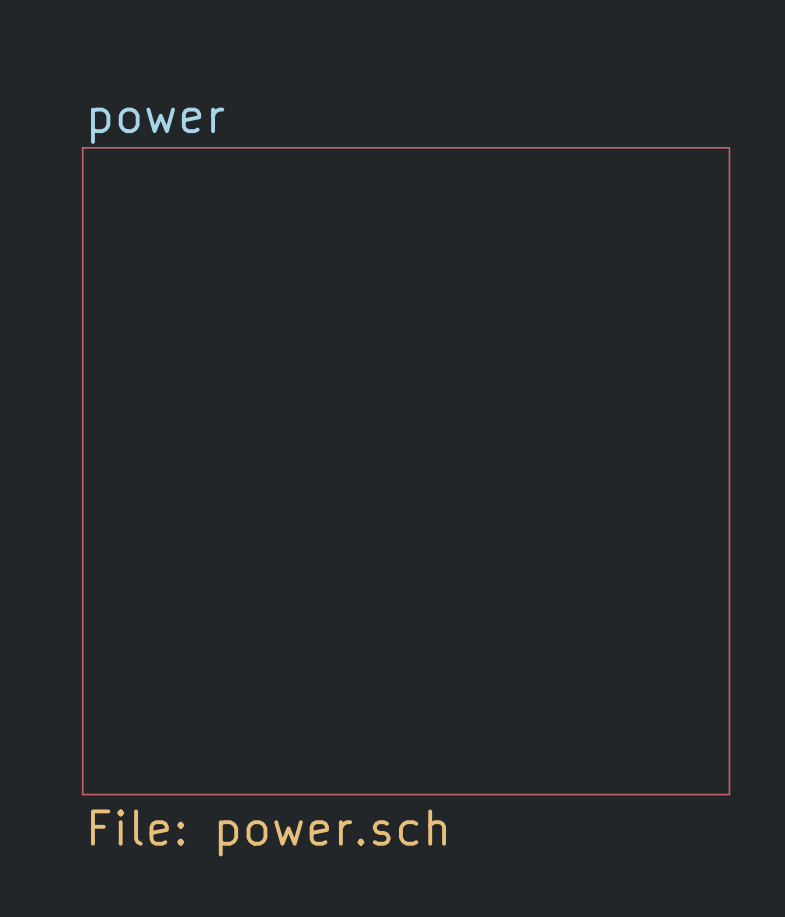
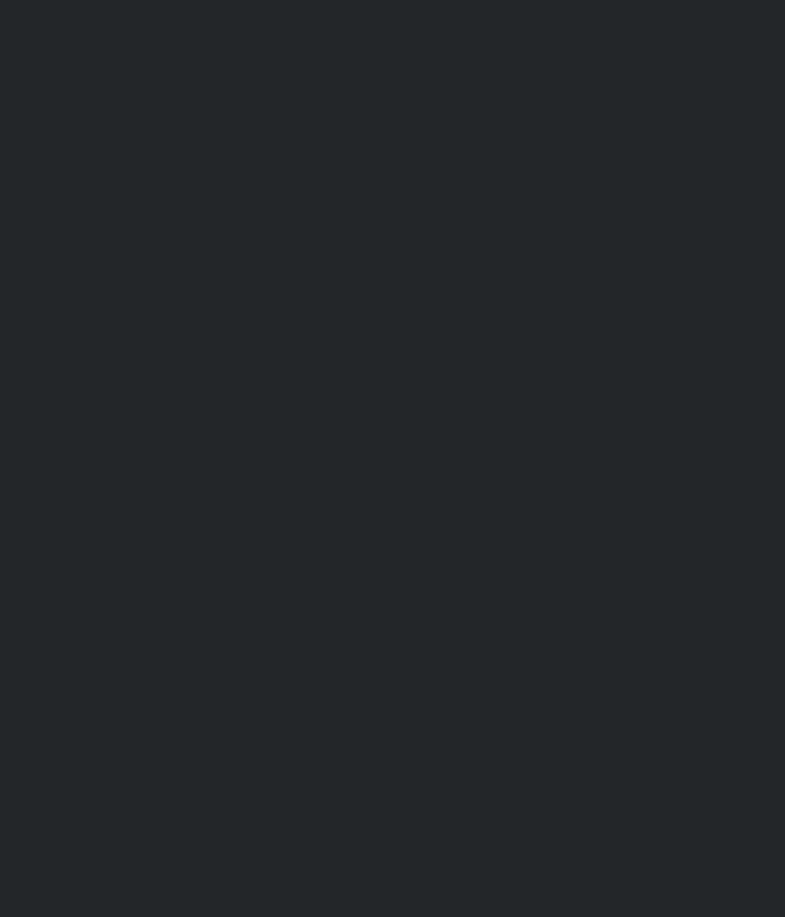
sheet power: File: power.sch (406, 471) -> none

